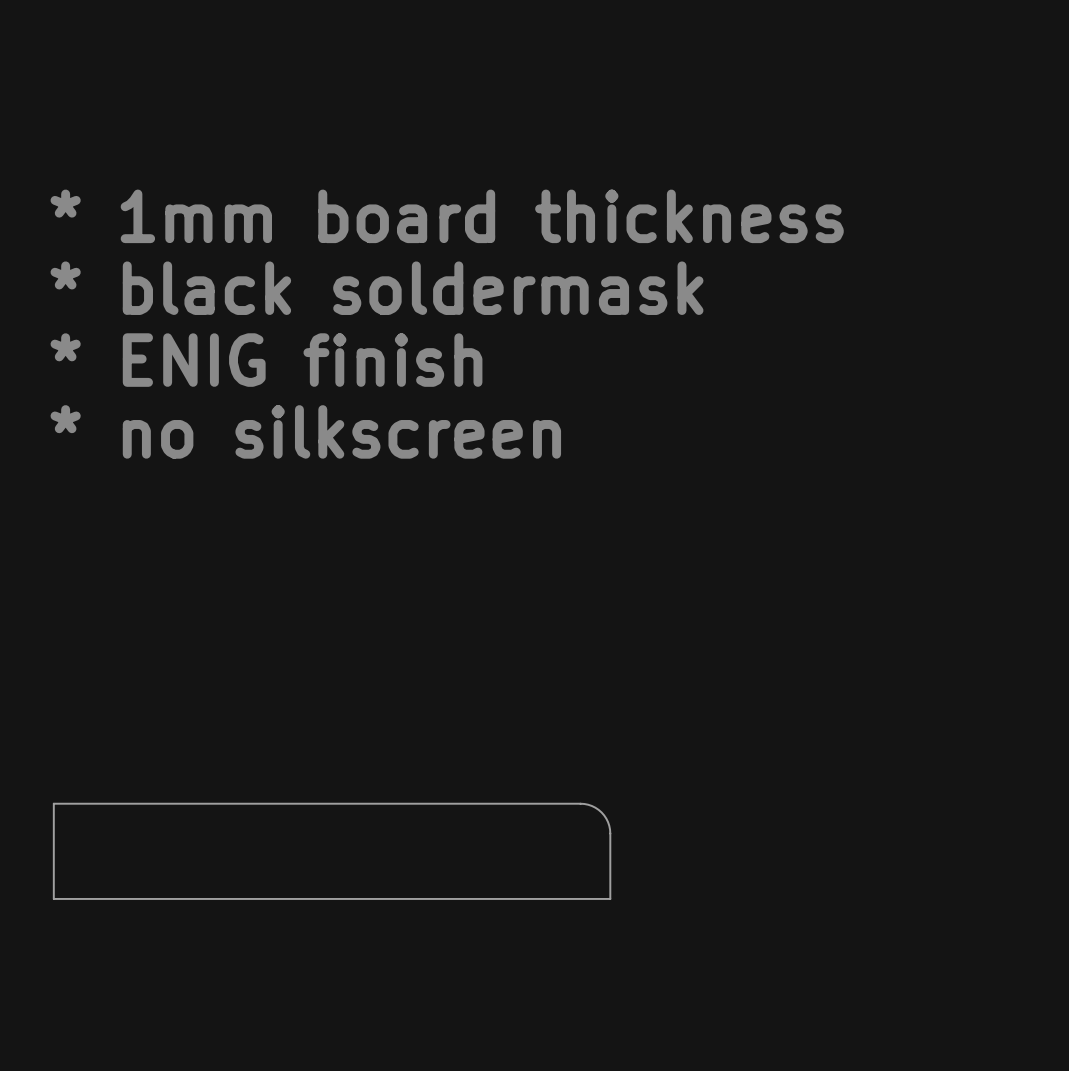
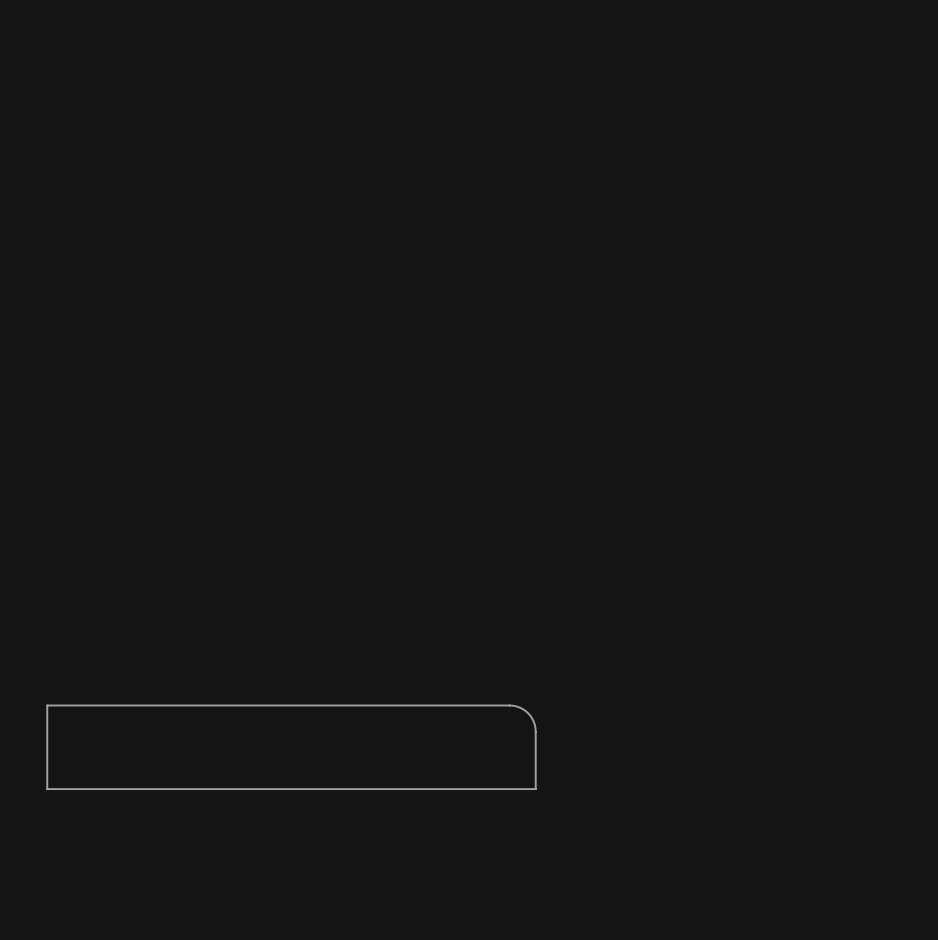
text: * 1mm board thickness (447, 216) -> none
text: * black soldermask (377, 288) -> none
text: * ENIG finish (266, 360) -> none
text: * no silkscreen (305, 431) -> none

